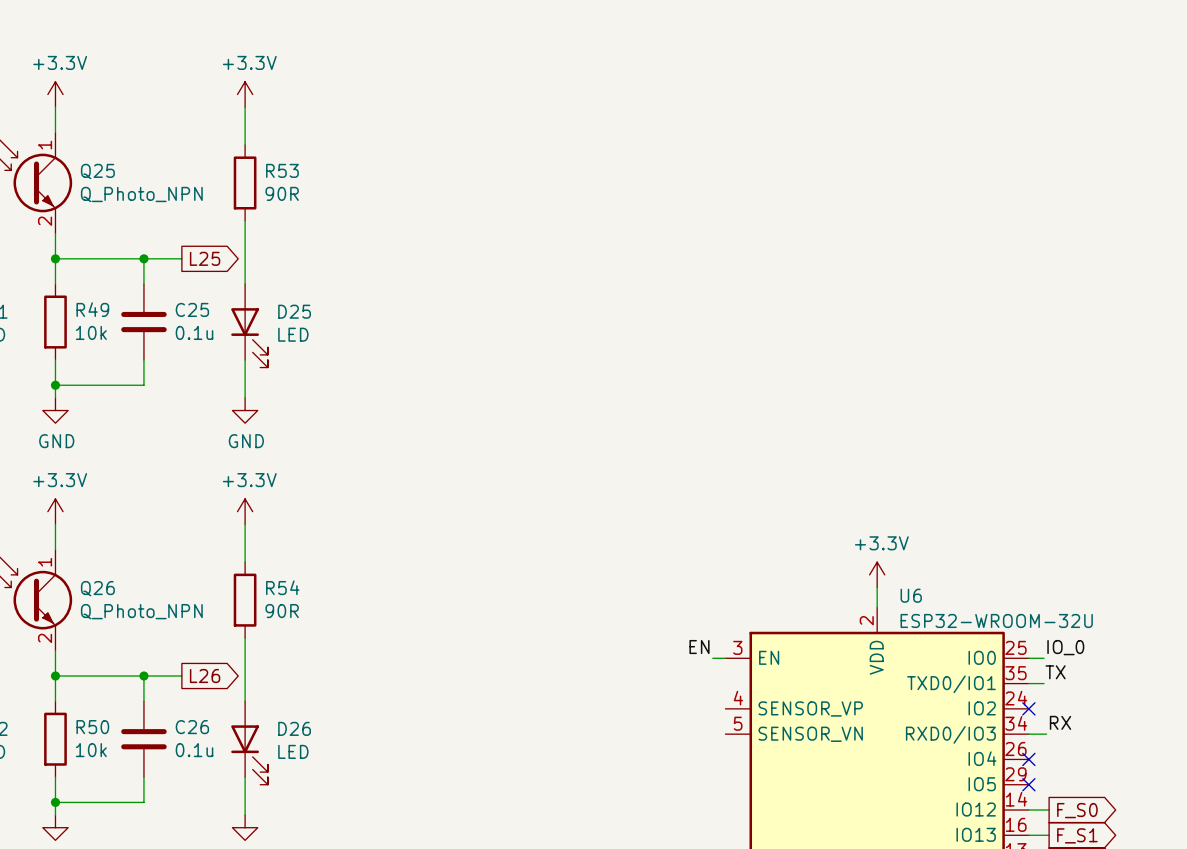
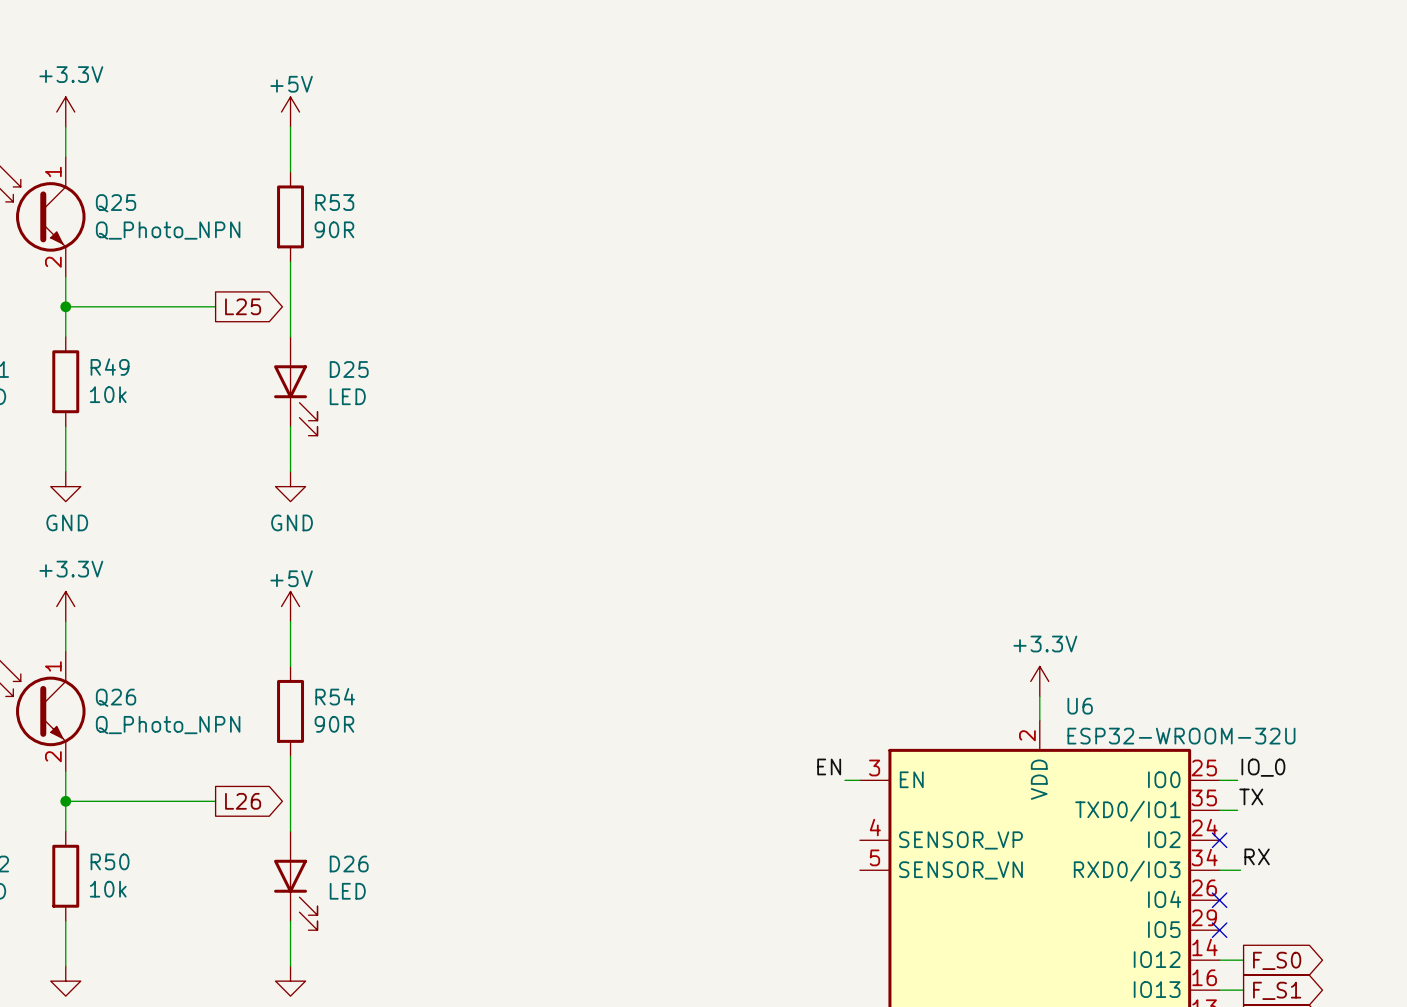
power symbol: +3.3V (245, 94) -> +5V (290, 112)
wire: (143, 258) (143, 284) -> none
junction: (143, 258) -> none
C25: 0.1u (143, 322) -> none
wire: (143, 359) (143, 385) (55, 385) -> none
junction: (55, 385) -> none
power symbol: +3.3V (245, 511) -> +5V (290, 606)
wire: (143, 676) (143, 701) -> none
junction: (143, 676) -> none
C26: 0.1u (143, 739) -> none
wire: (143, 777) (143, 802) (55, 802) -> none
junction: (55, 802) -> none

